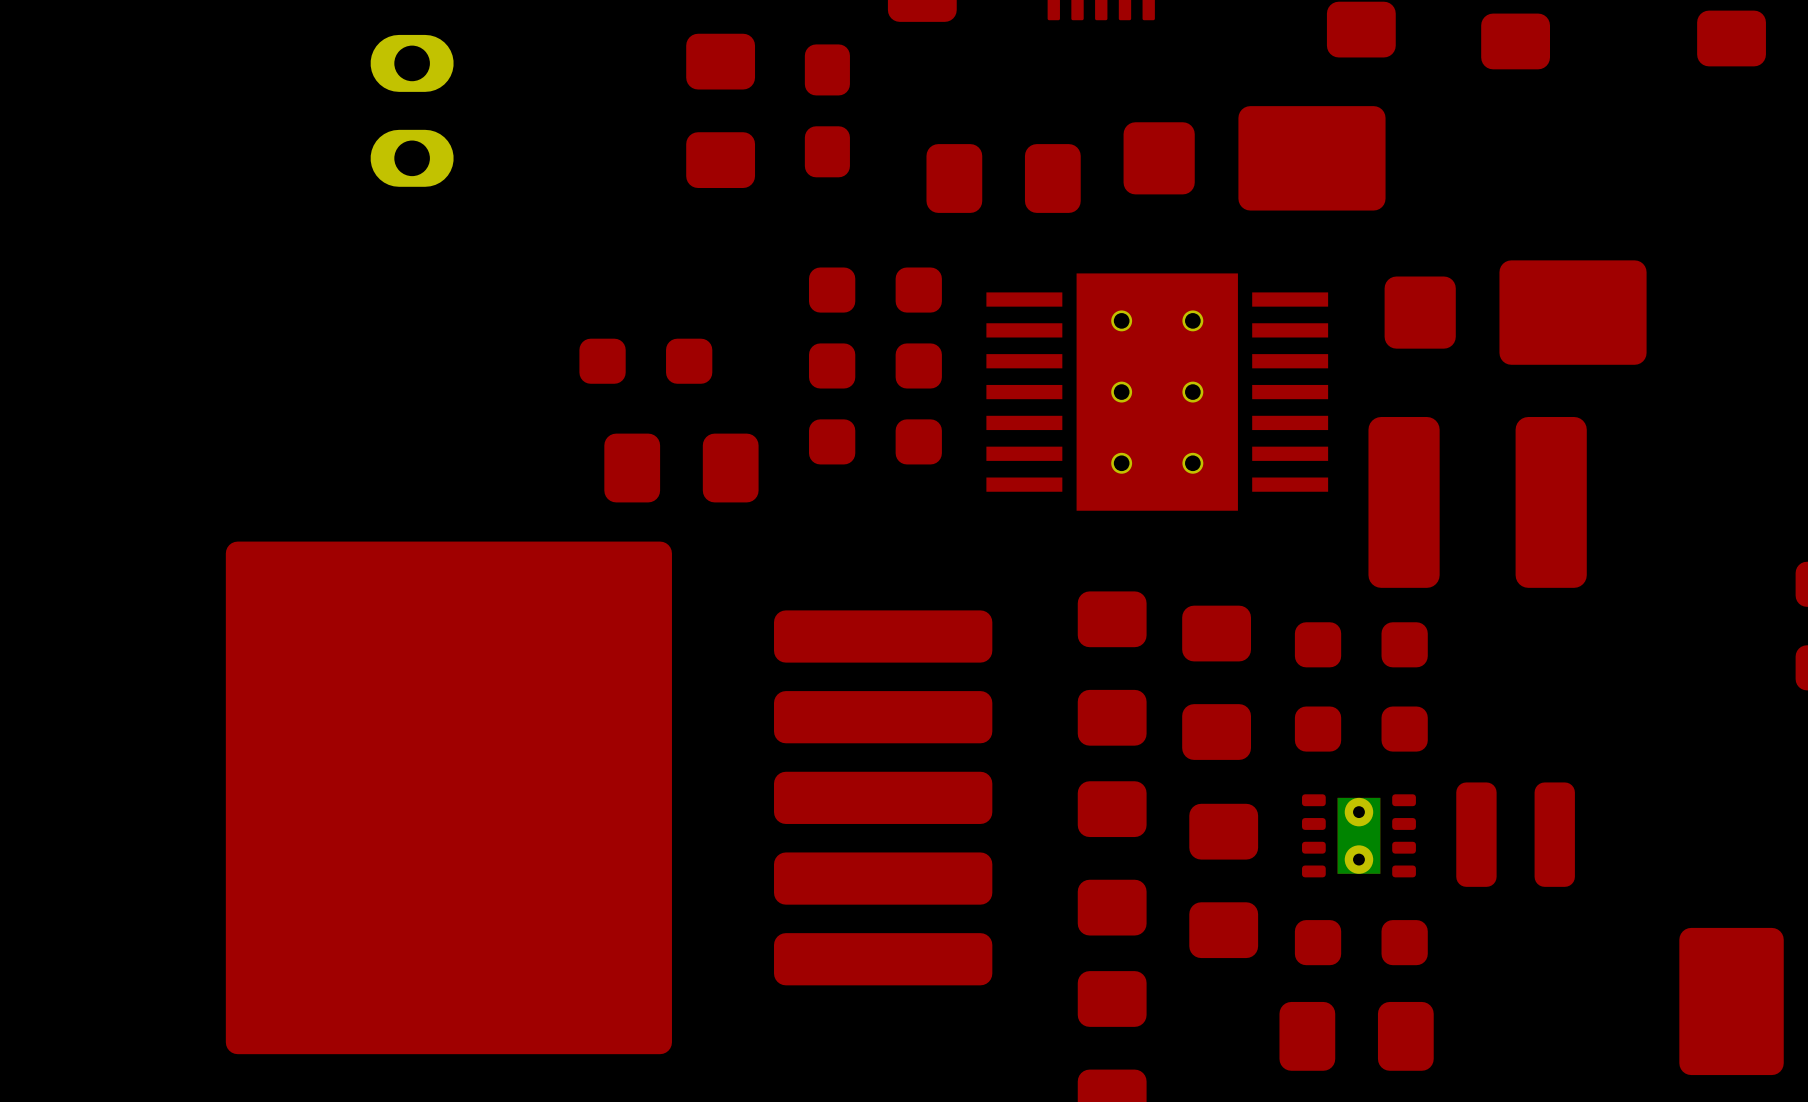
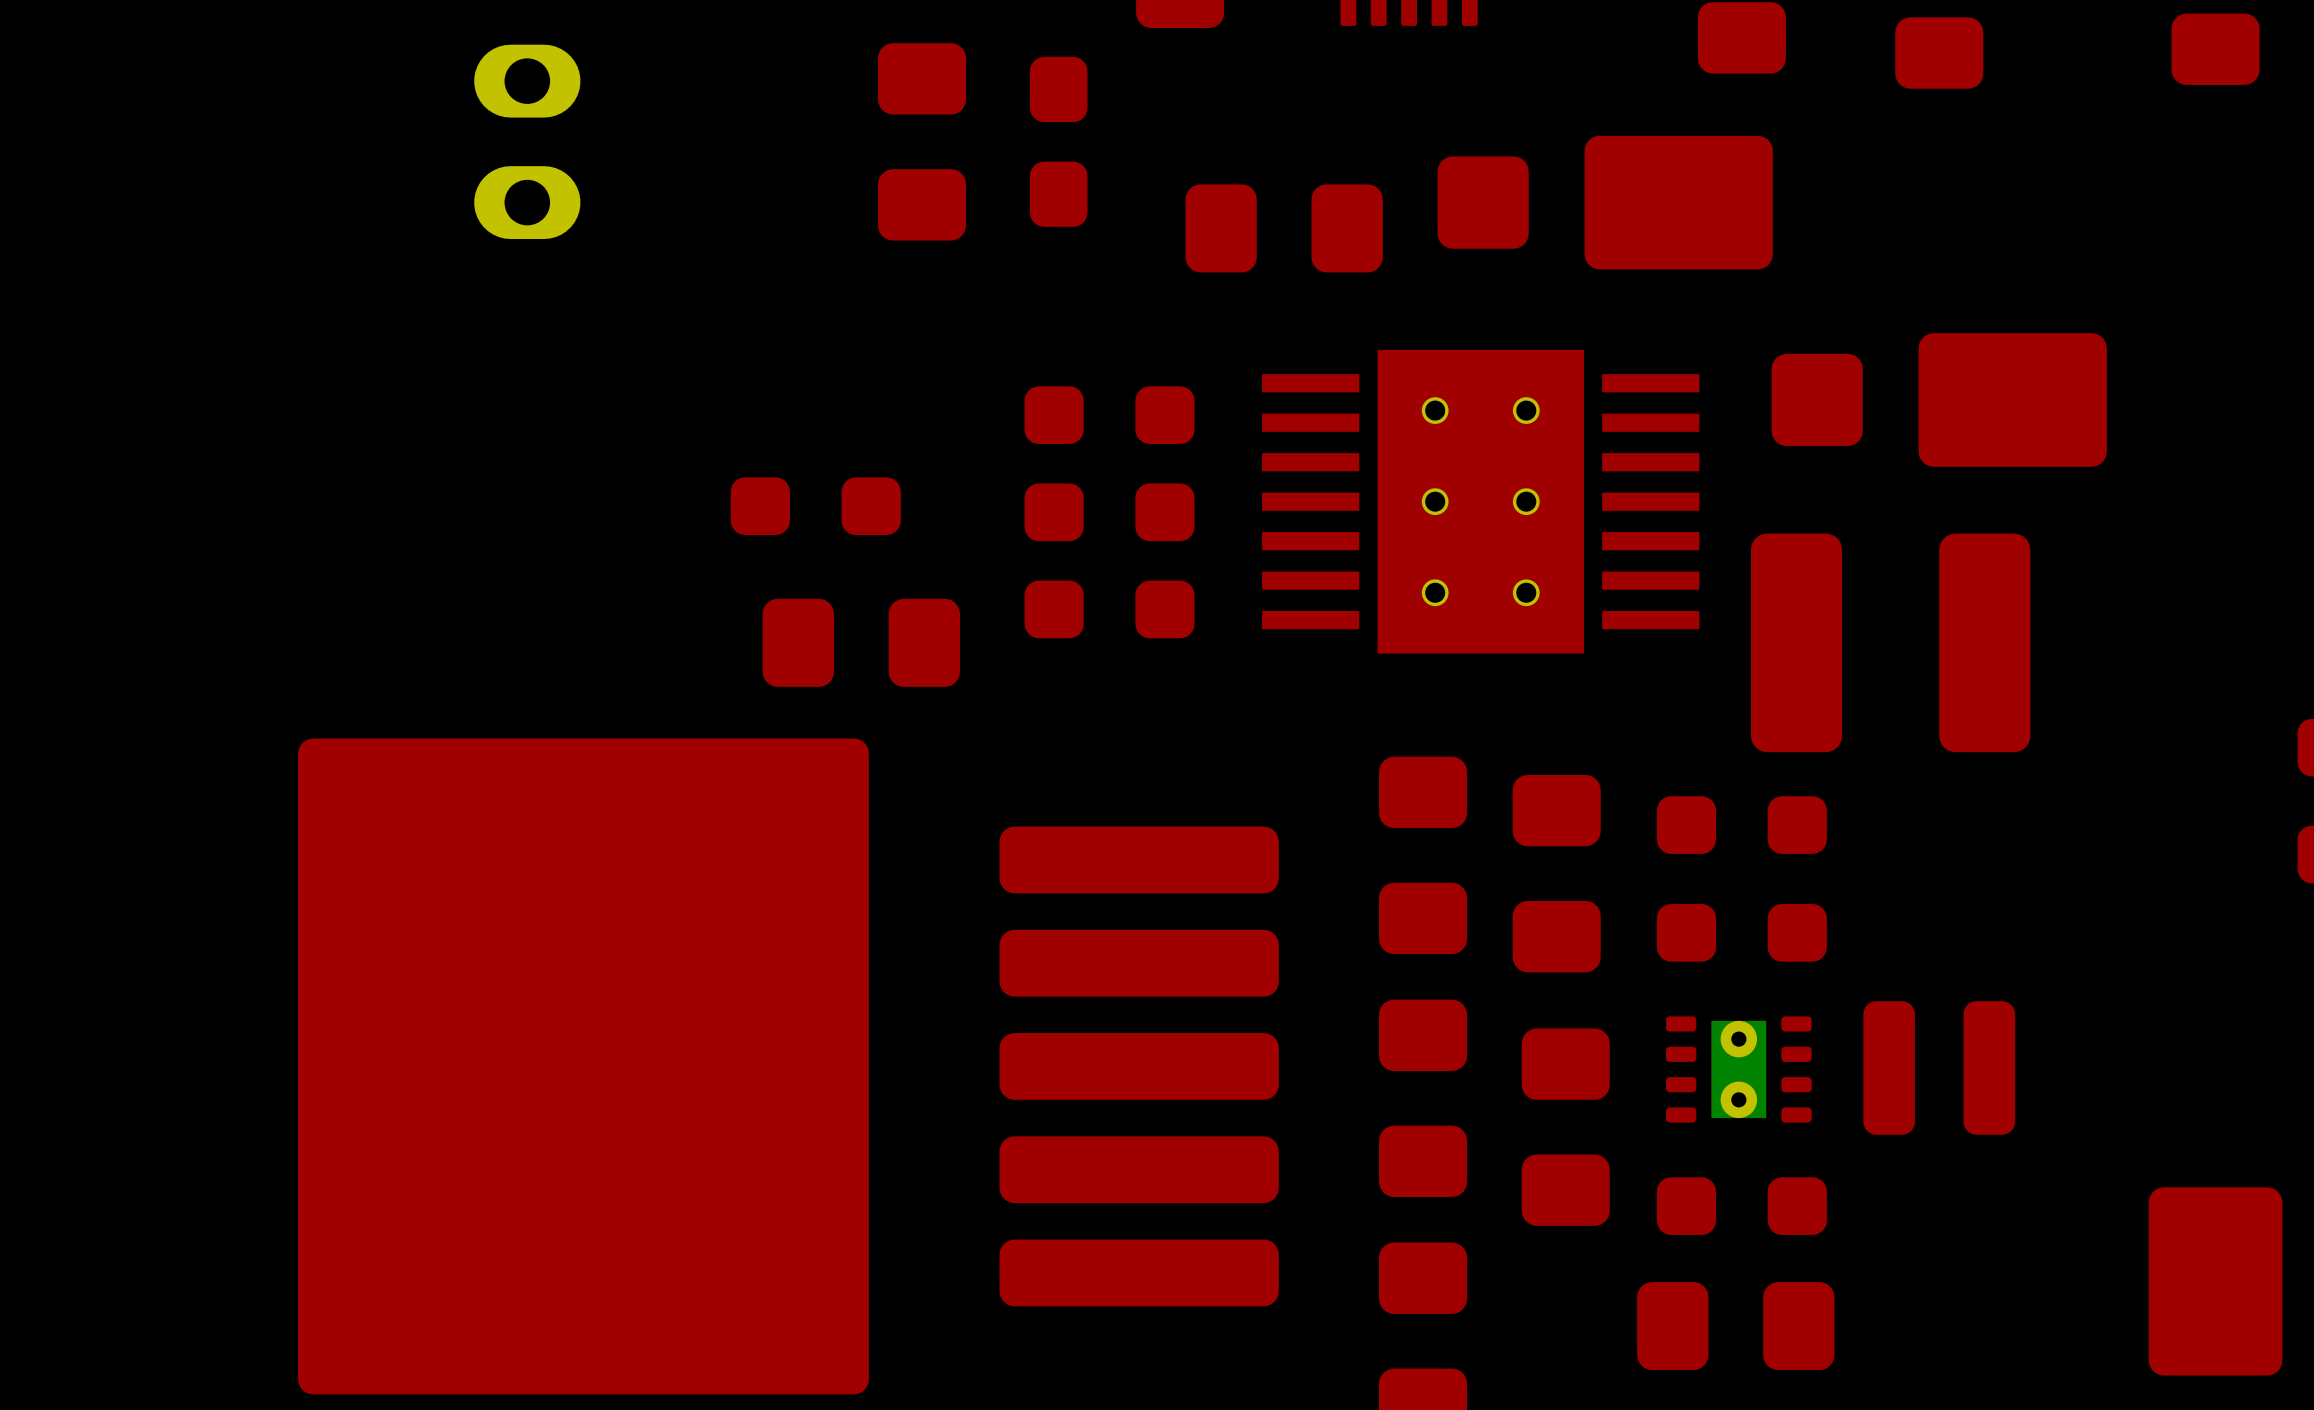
part: (875, 290) -> none
part: none -> (1109, 415)
part position: (645, 361) -> (815, 506)
part: (875, 365) -> none
part: none -> (1109, 512)
part: (875, 441) -> none
part position: (681, 468) -> (861, 642)
part: none -> (1109, 609)
part position: (609, 797) -> (788, 1066)

